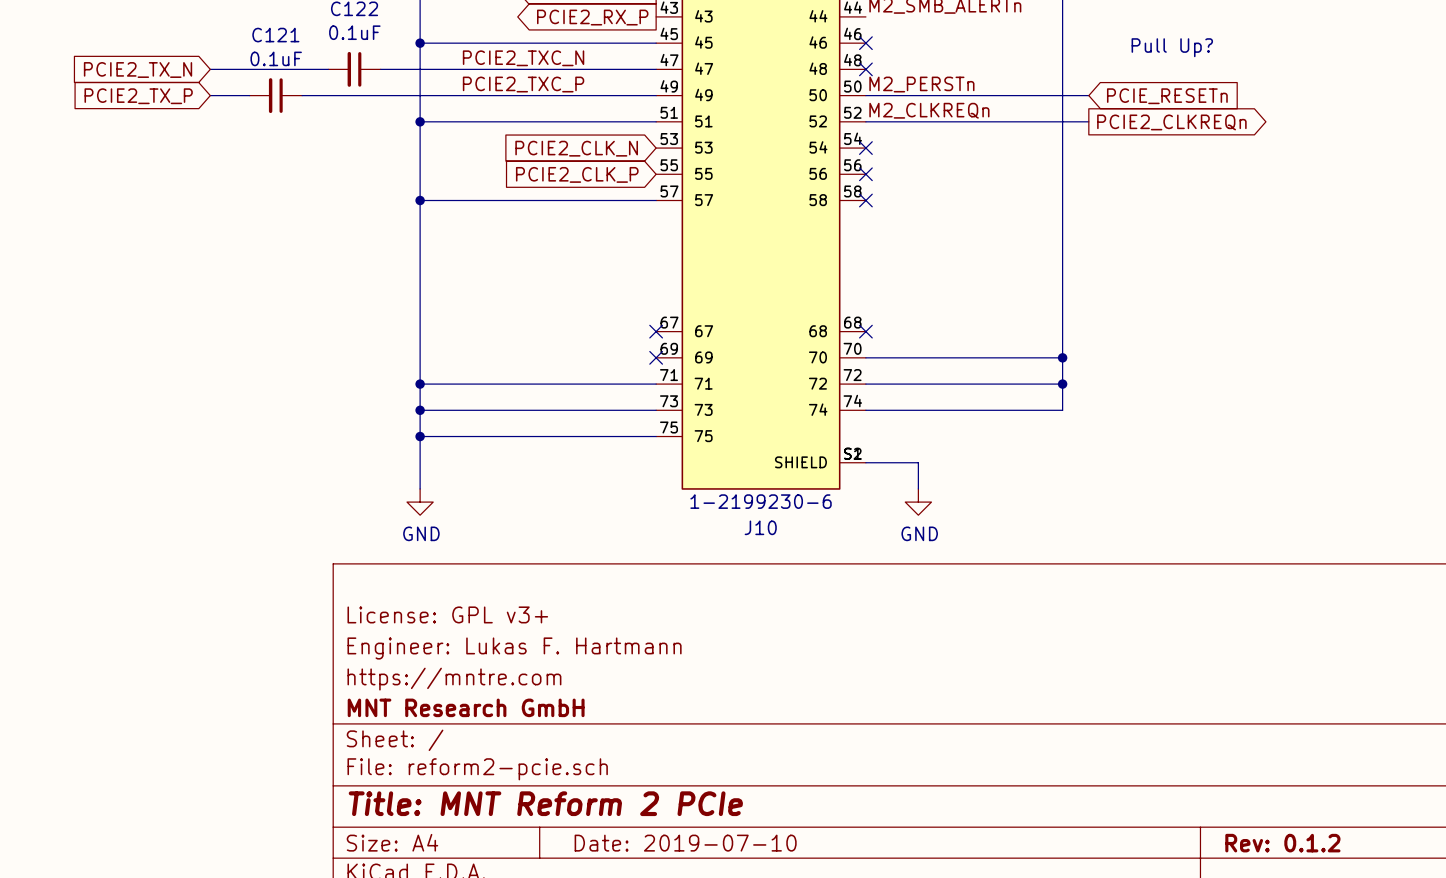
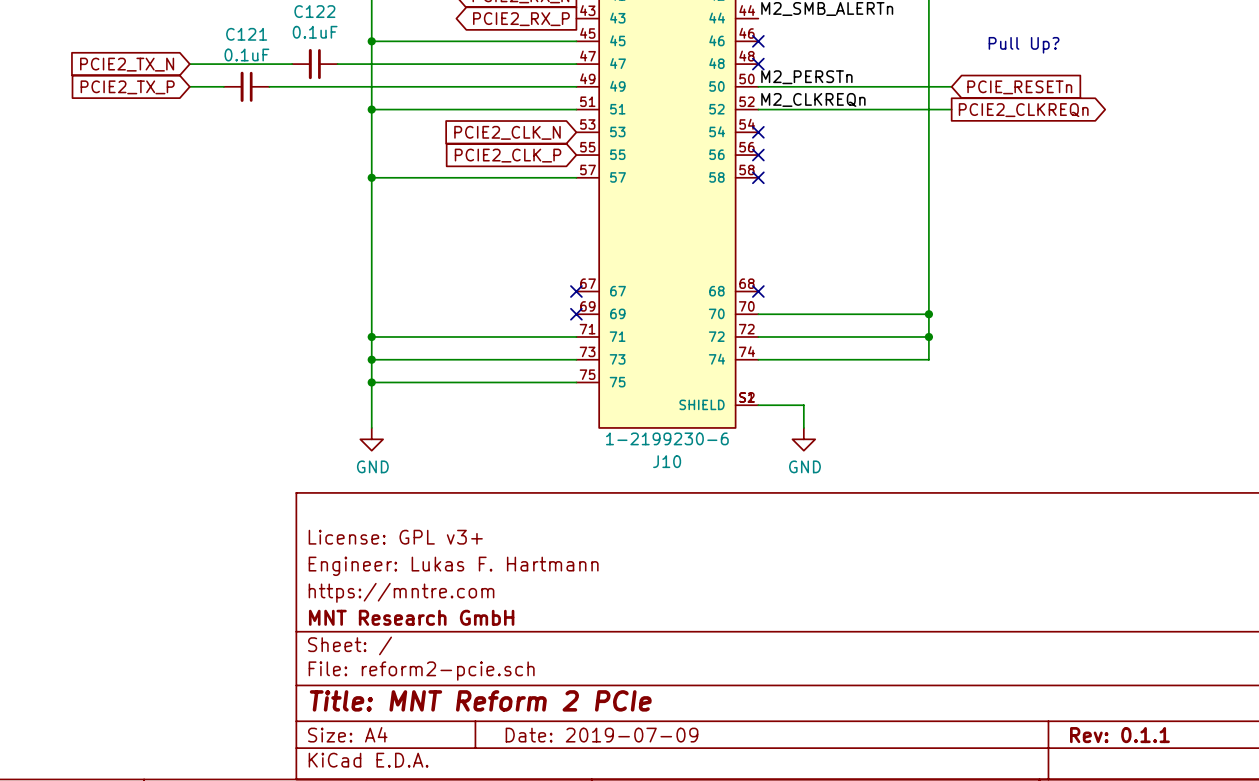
label: PCIE2_TXC_N (523, 58) -> none
label: PCIE2_TXC_P (523, 84) -> none
title block: Date: 2019-07-10 (685, 843) -> Date: 2019-07-09 (602, 735)
title block: Rev: 0.1.2 (1282, 843) -> Rev: 0.1.1 (1119, 735)

